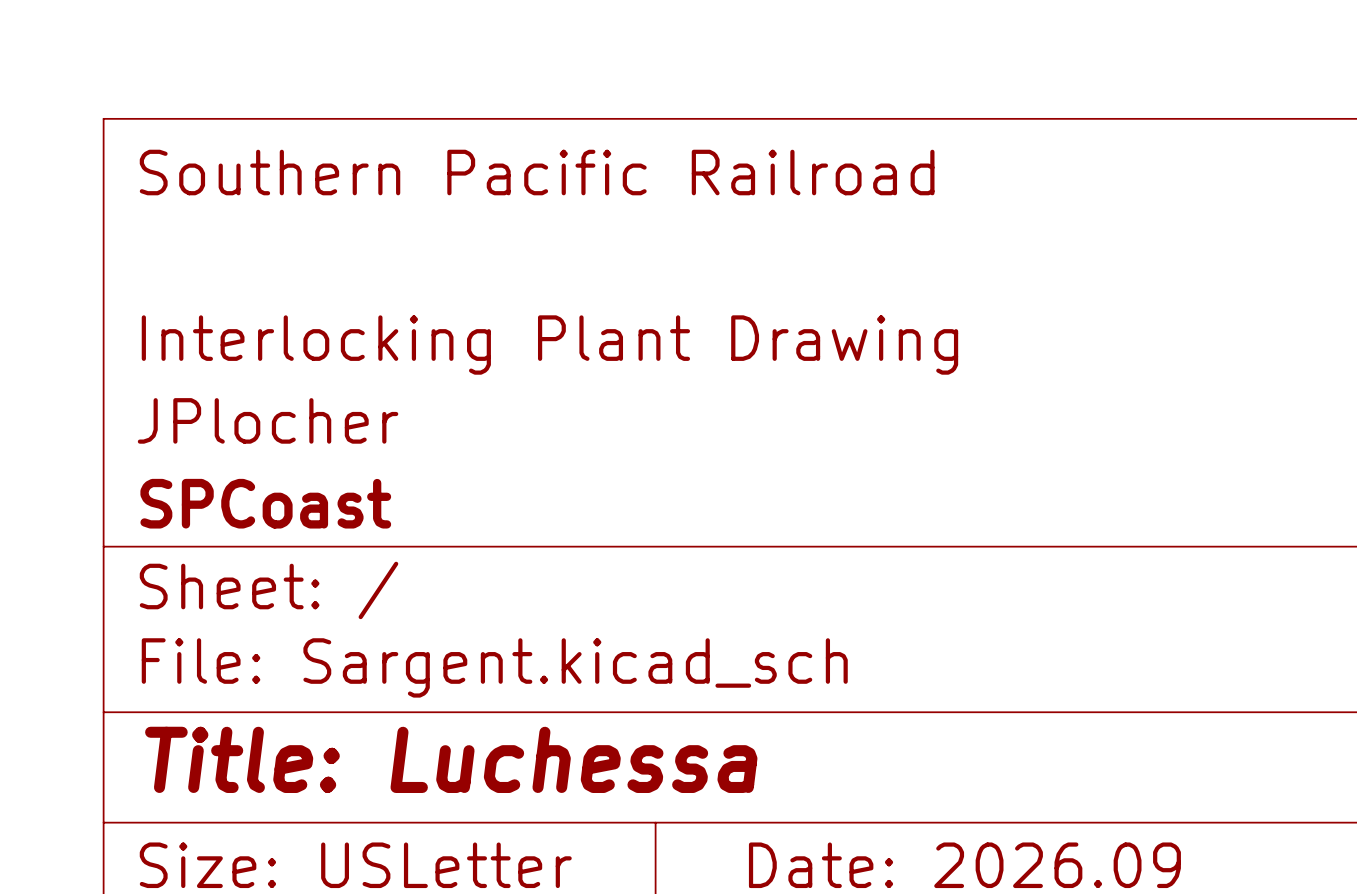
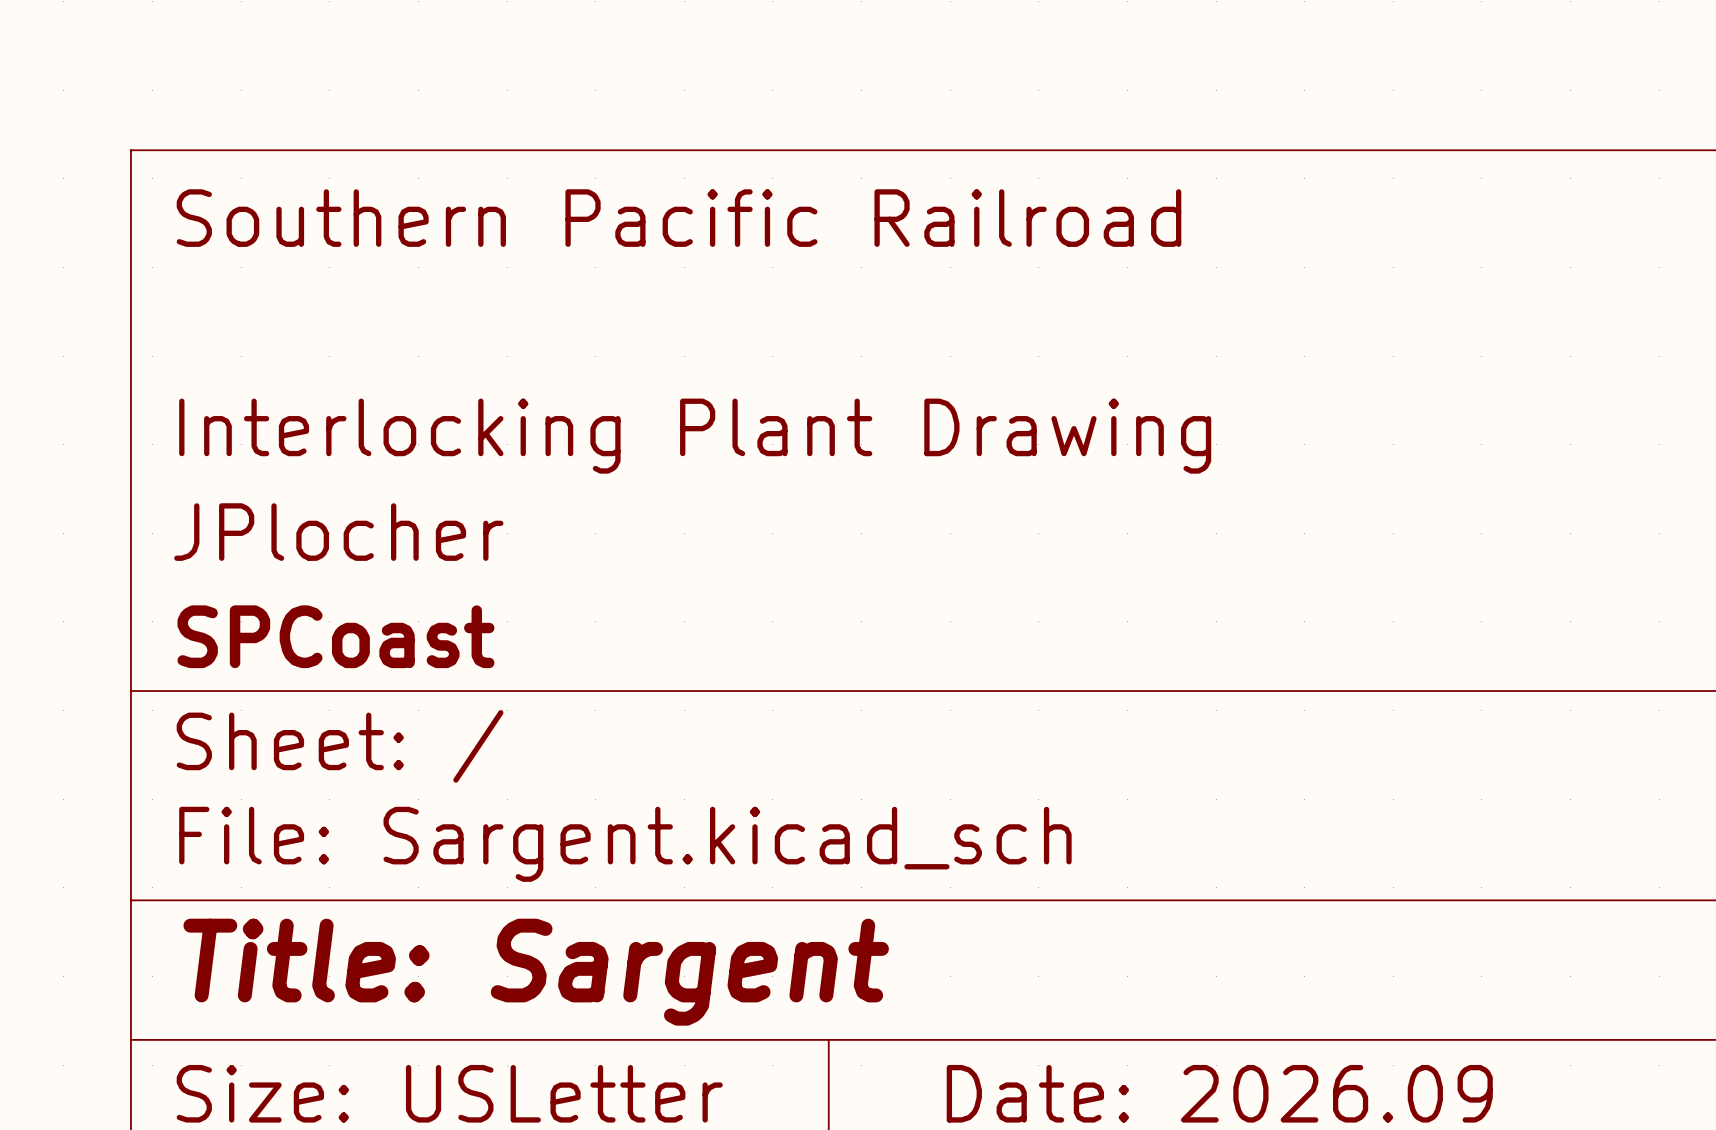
title block: Title: Luchessa (451, 759) -> Title: Sargent (536, 972)

